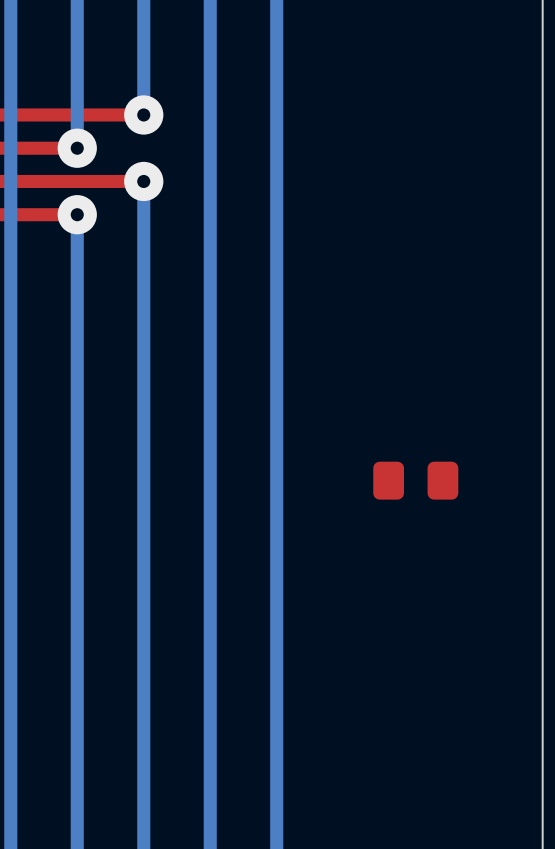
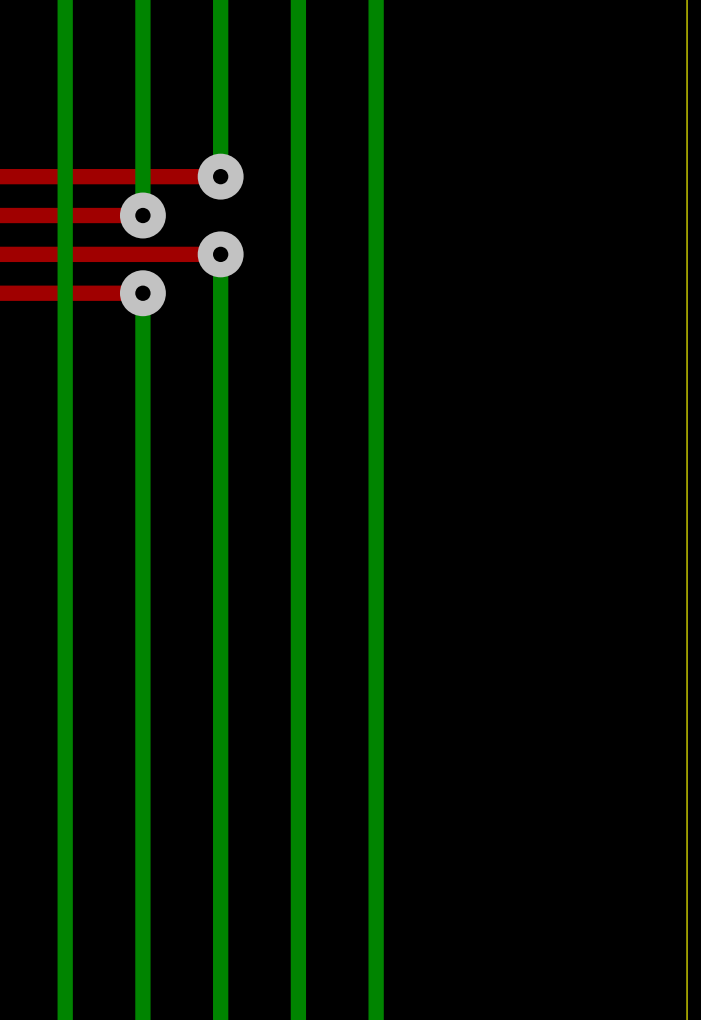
part: (415, 480) -> none

